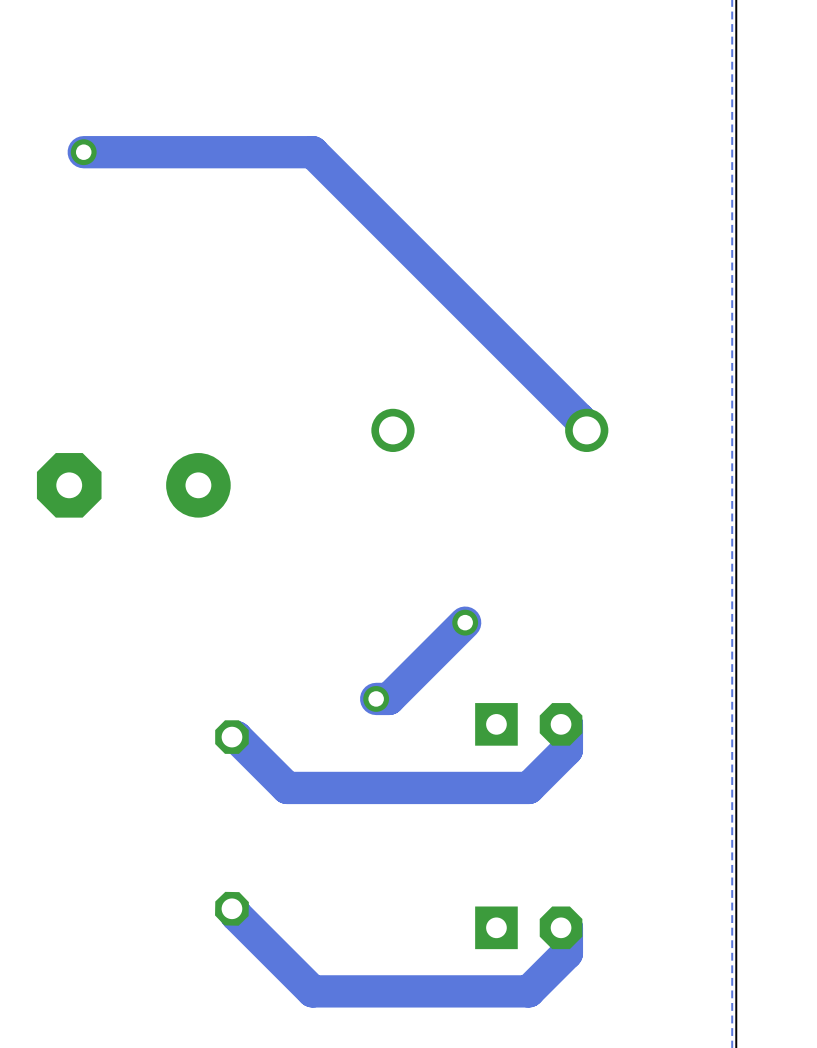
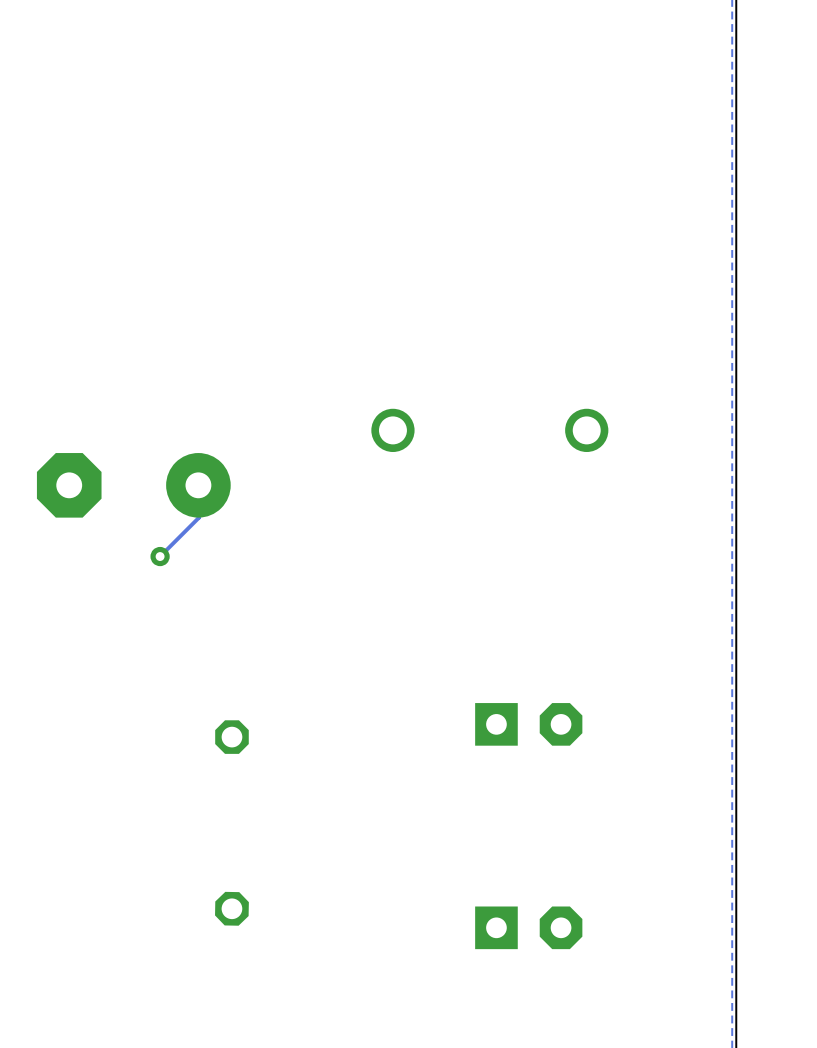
track: (83, 152) (312, 152) (579, 419) (586, 430) -> none
via: (83, 152) -> none
track: none -> (198, 485) (198, 517) (160, 556)
via: none -> (160, 556)
track: (465, 622) (388, 698) (376, 698) -> none
via: (465, 622) -> none
via: (376, 698) -> none
track: (561, 724) (566, 724) (566, 749) (528, 787) (287, 787) (236, 737) (231, 737) -> none
track: (231, 908) (312, 991) (528, 991) (566, 953) (566, 927) (561, 927) -> none

